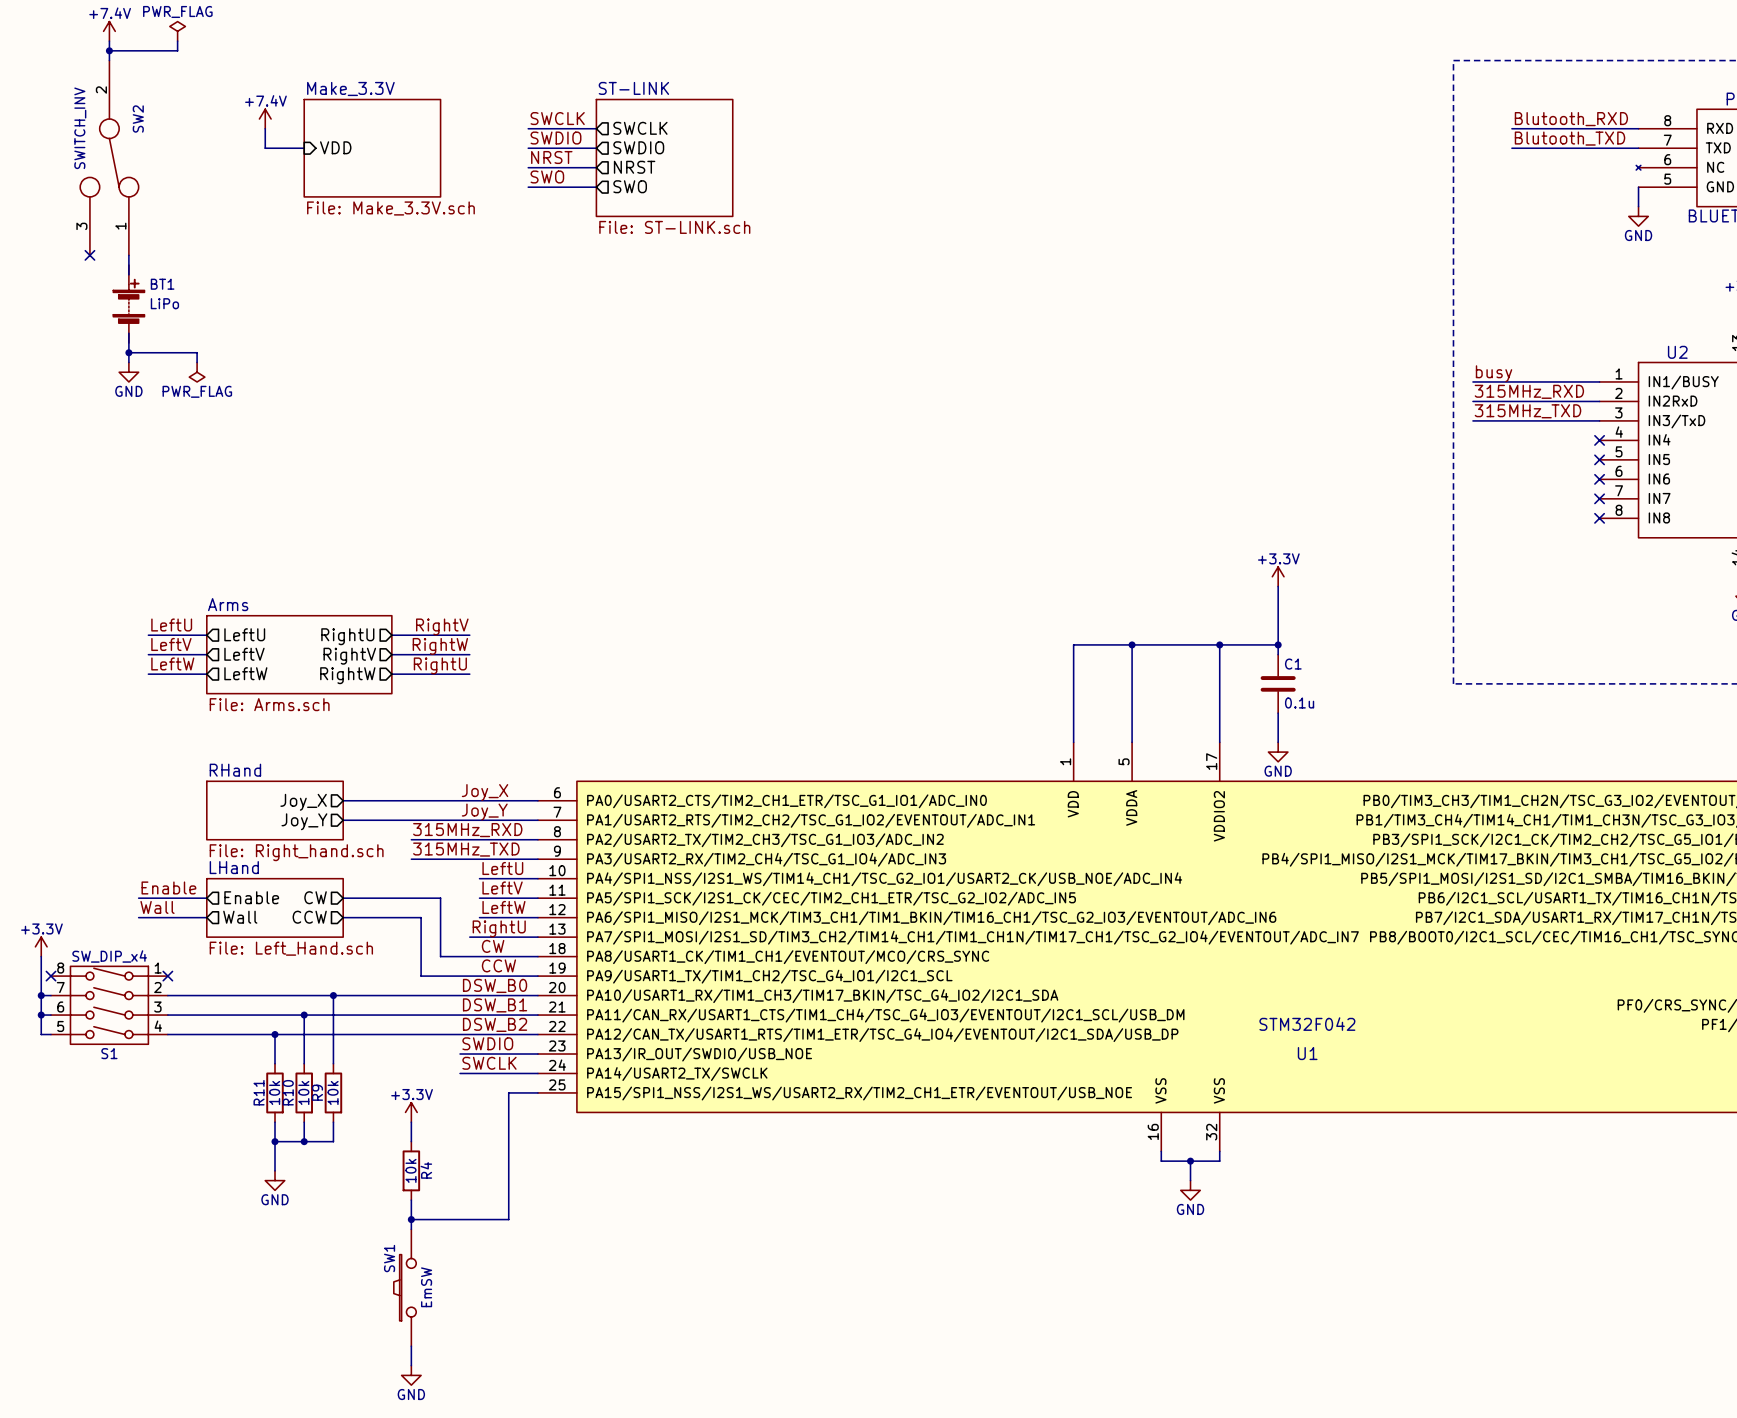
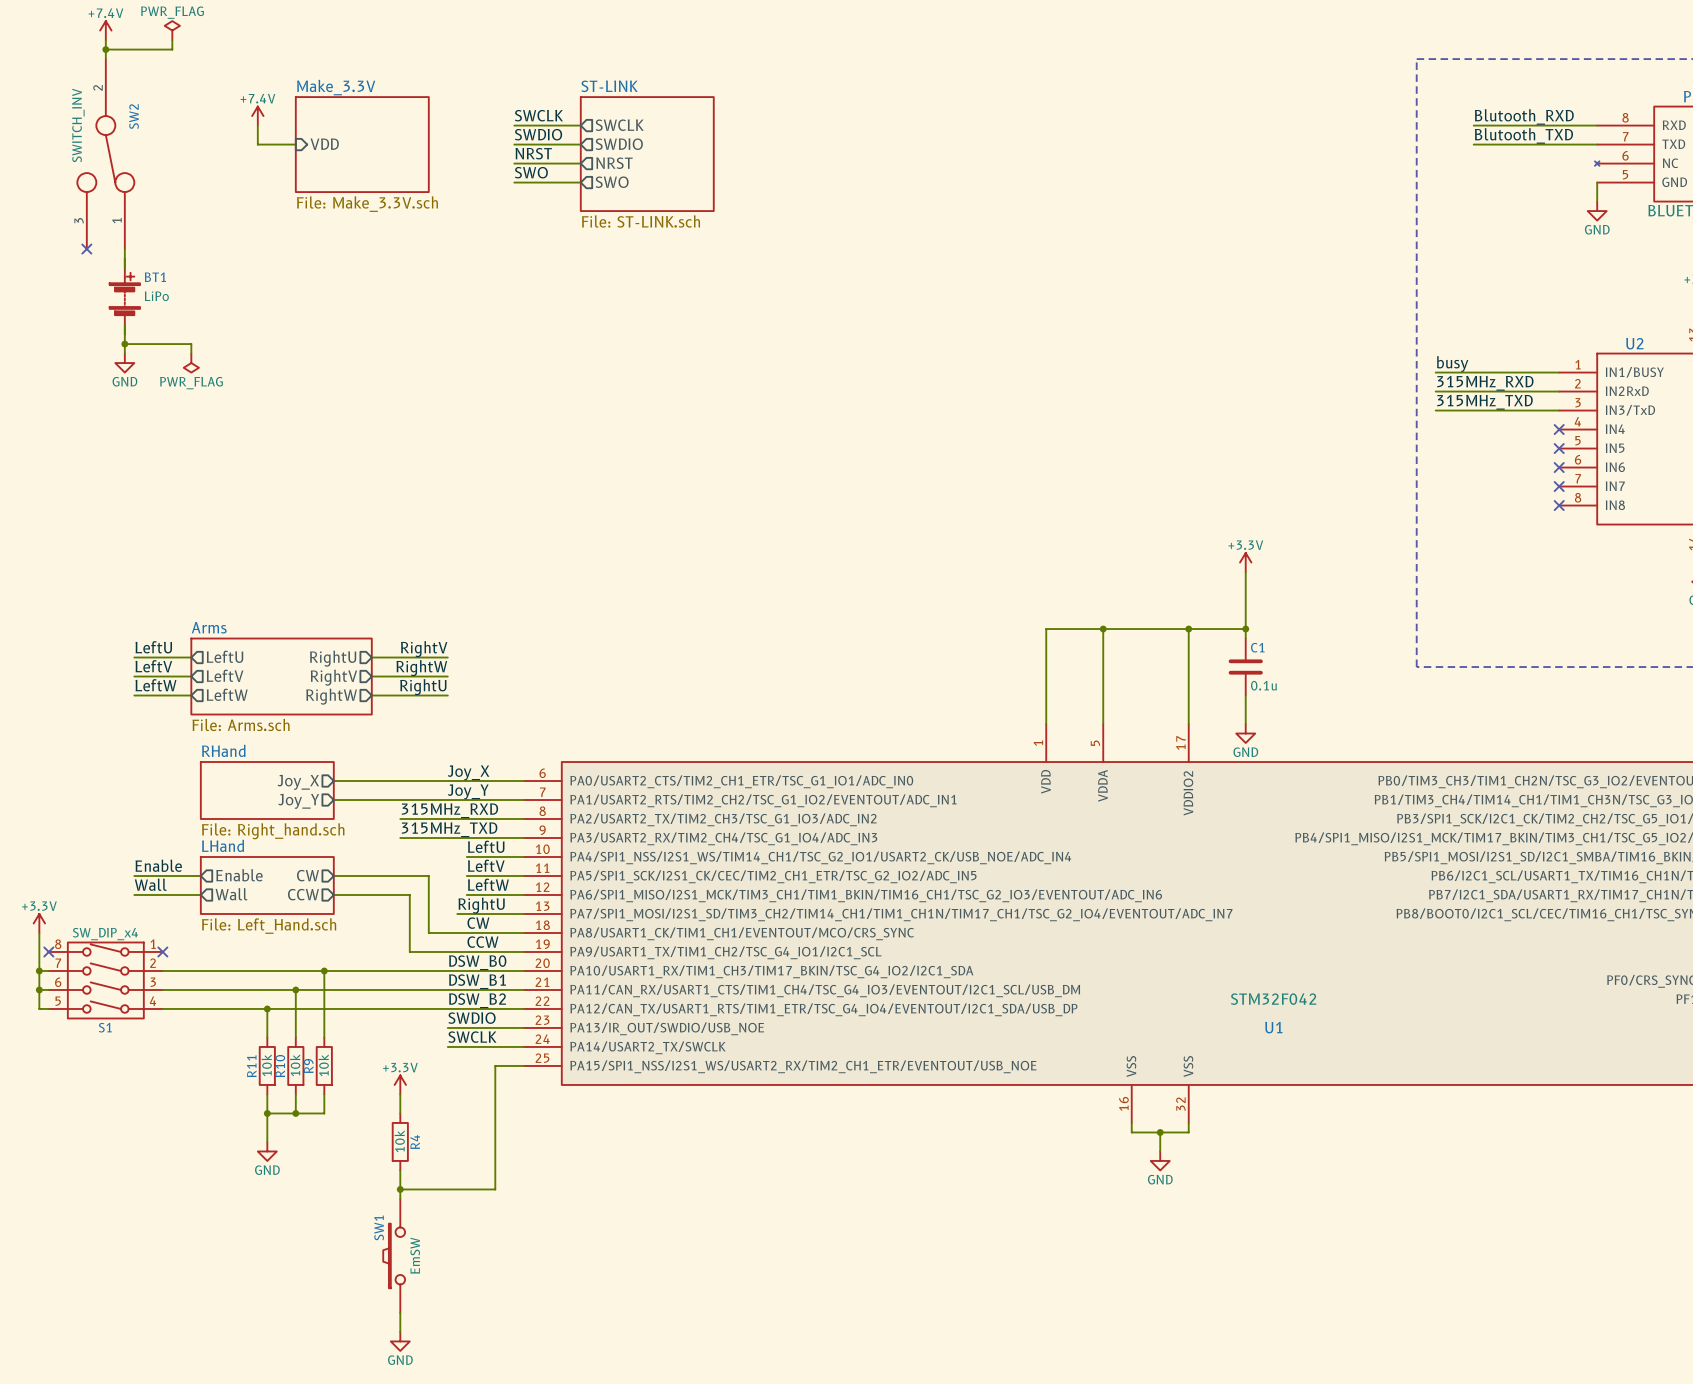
label position: LeftU (171, 625) -> LeftU (153, 647)
label position: RightV (442, 626) -> RightV (424, 649)
sheet pin position: LeftU (244, 634) -> LeftU (225, 656)
wire: (148, 635) (206, 635) -> (134, 676) (191, 676)
wire: (391, 635) (469, 635) -> (371, 676) (447, 676)
sheet pin position: RightU (347, 636) -> RightU (333, 658)
label position: LeftV (171, 644) -> LeftV (153, 666)
label position: RightW (440, 646) -> RightW (421, 668)
wire: (148, 654) (206, 654) -> (134, 695) (191, 695)
sheet pin position: LeftV (244, 654) -> LeftV (225, 675)
sheet Arms position: (299, 654) -> (281, 676)
wire: (391, 654) (469, 654) -> (371, 695) (447, 695)
sheet pin position: RightV (349, 656) -> RightV (333, 677)
label position: LeftW (172, 663) -> LeftW (155, 685)
label position: RightU (440, 665) -> RightU (423, 687)
sheet pin position: LeftW (245, 673) -> LeftW (227, 694)
wire: (197, 674) (206, 674) -> (134, 657) (143, 657)
wire: (460, 674) (469, 674) -> (371, 657) (381, 657)
sheet pin position: RightW (347, 675) -> RightW (331, 696)

